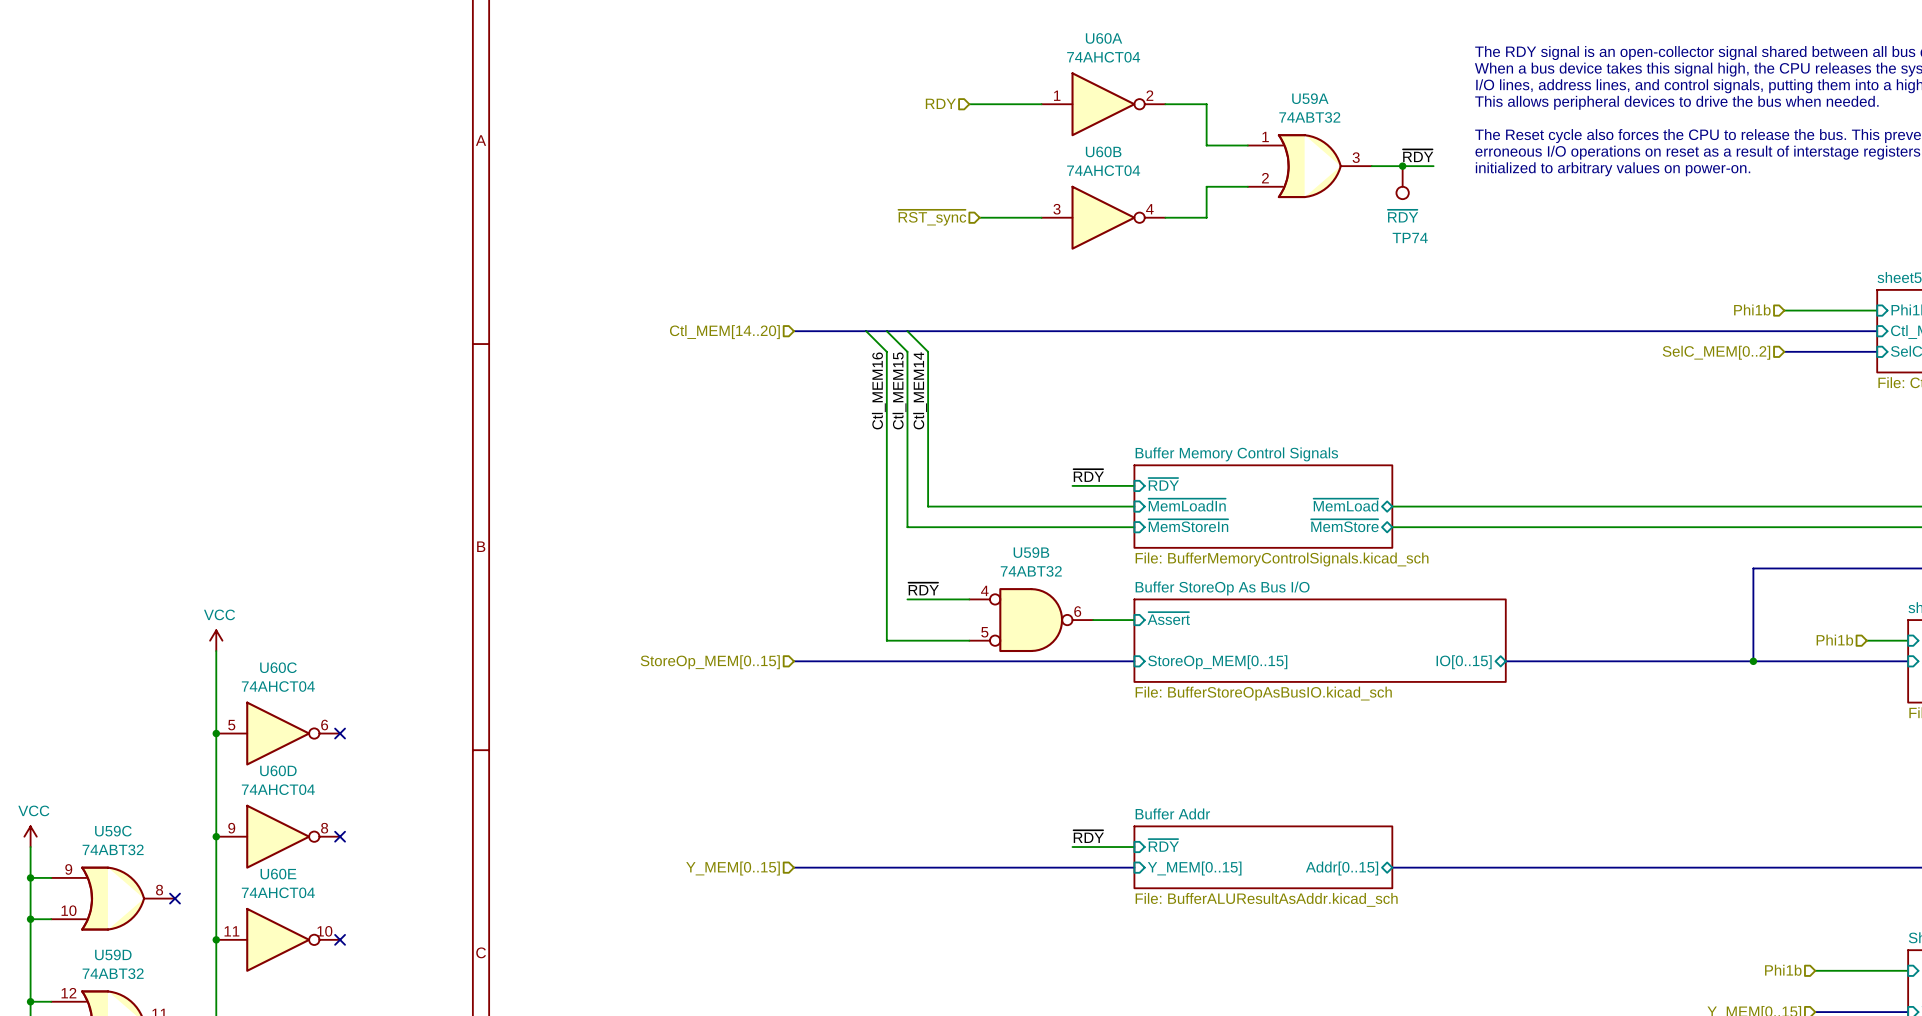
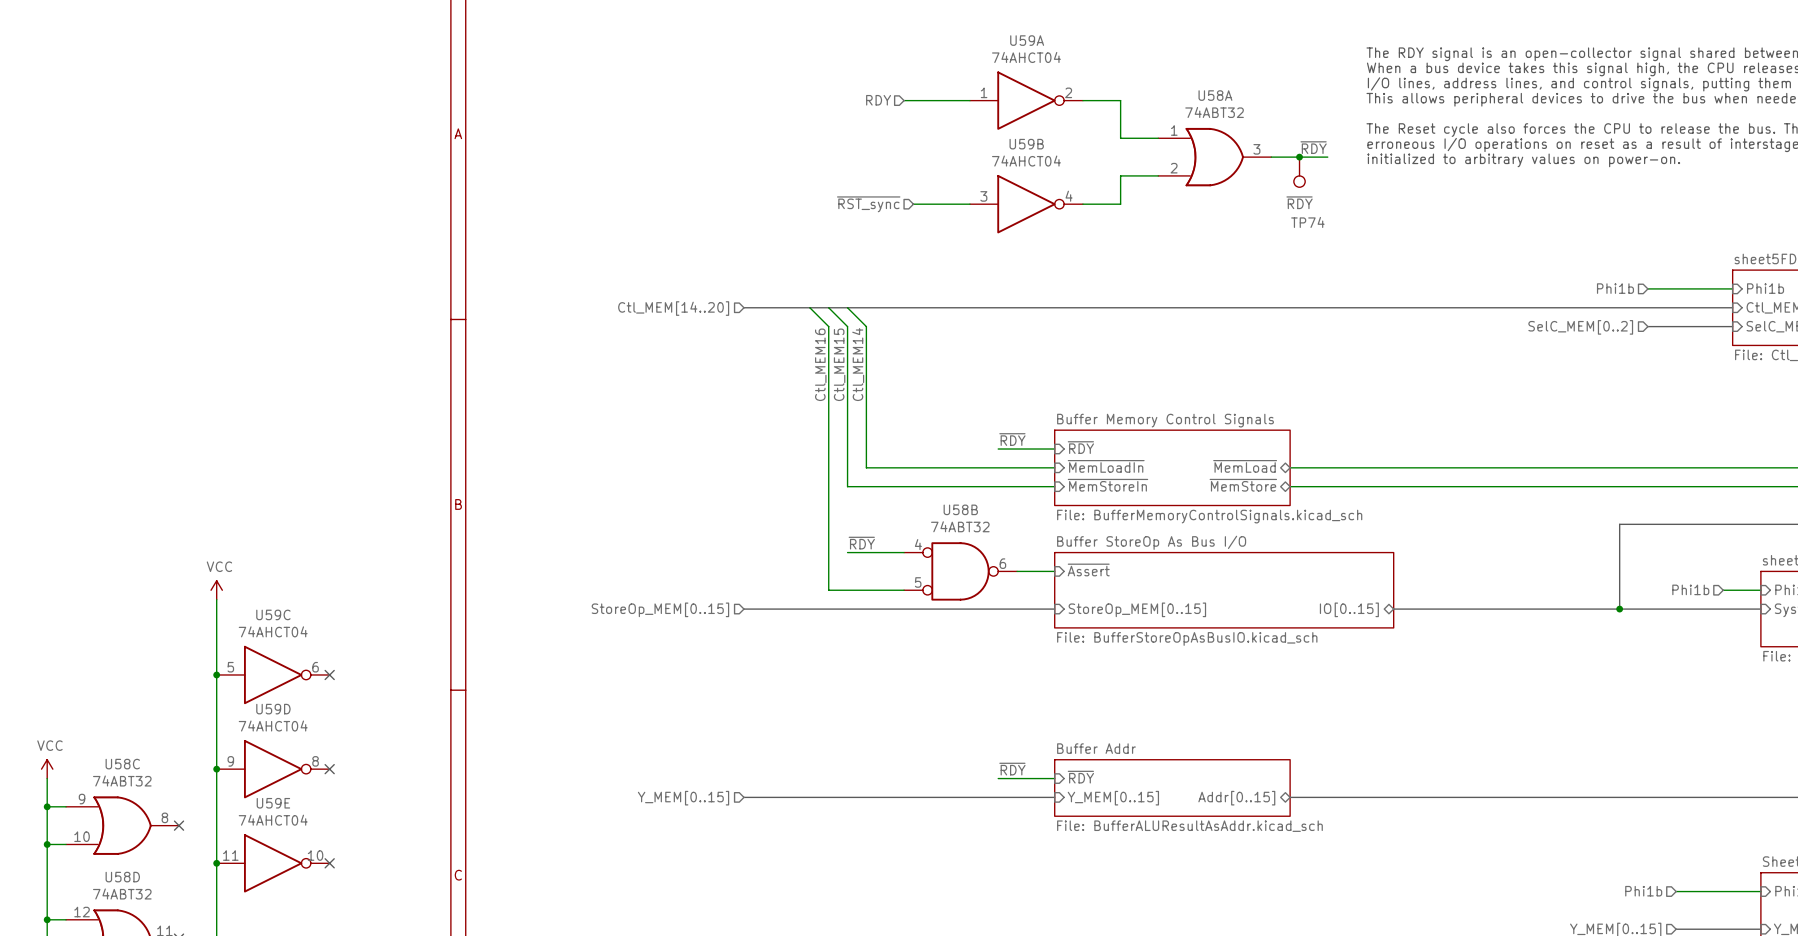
U60A name: U60A (1104, 38) -> U59A (1027, 40)
U59A name: U59A (1310, 98) -> U58A (1215, 95)
U60B name: U60B (1103, 151) -> U59B (1026, 144)
U59B name: U59B (1031, 552) -> U58B (960, 509)
U60C name: U60C (278, 667) -> U59C (273, 614)
U60D name: U60D (278, 770) -> U59D (273, 709)
U59C name: U59C (113, 831) -> U58C (122, 764)
U60E name: U60E (278, 874) -> U59E (273, 803)
U59D name: U59D (113, 954) -> U58D (122, 877)

